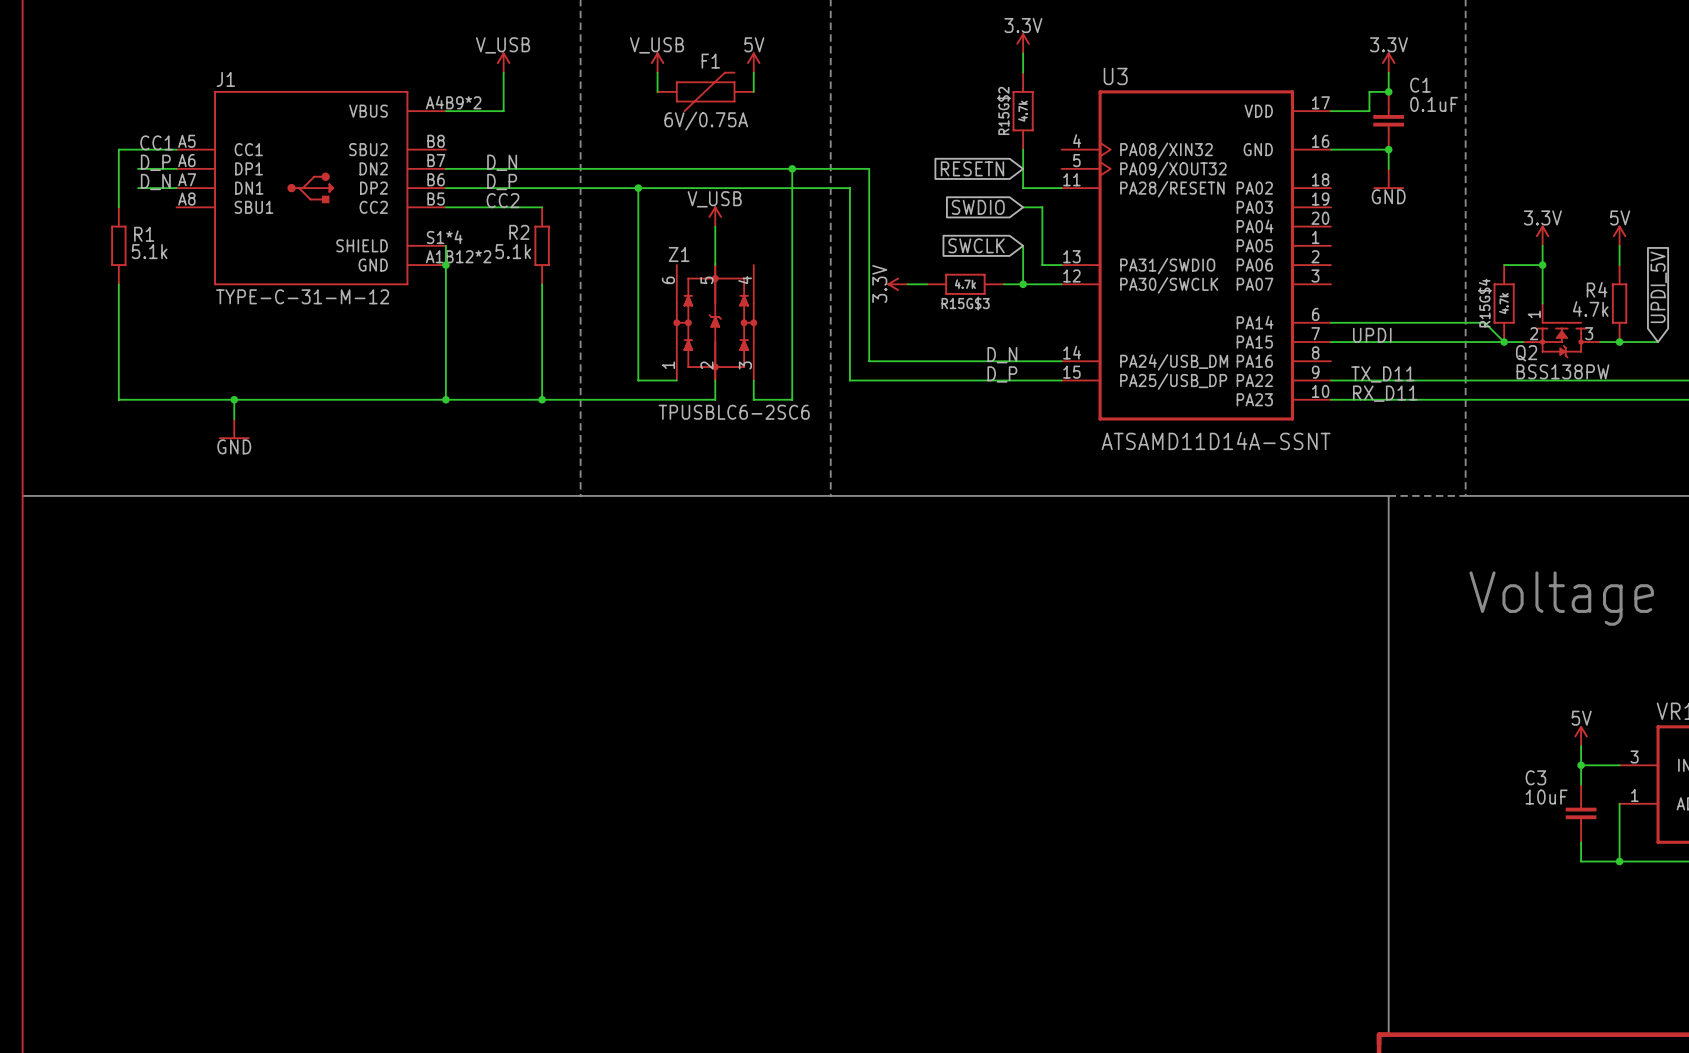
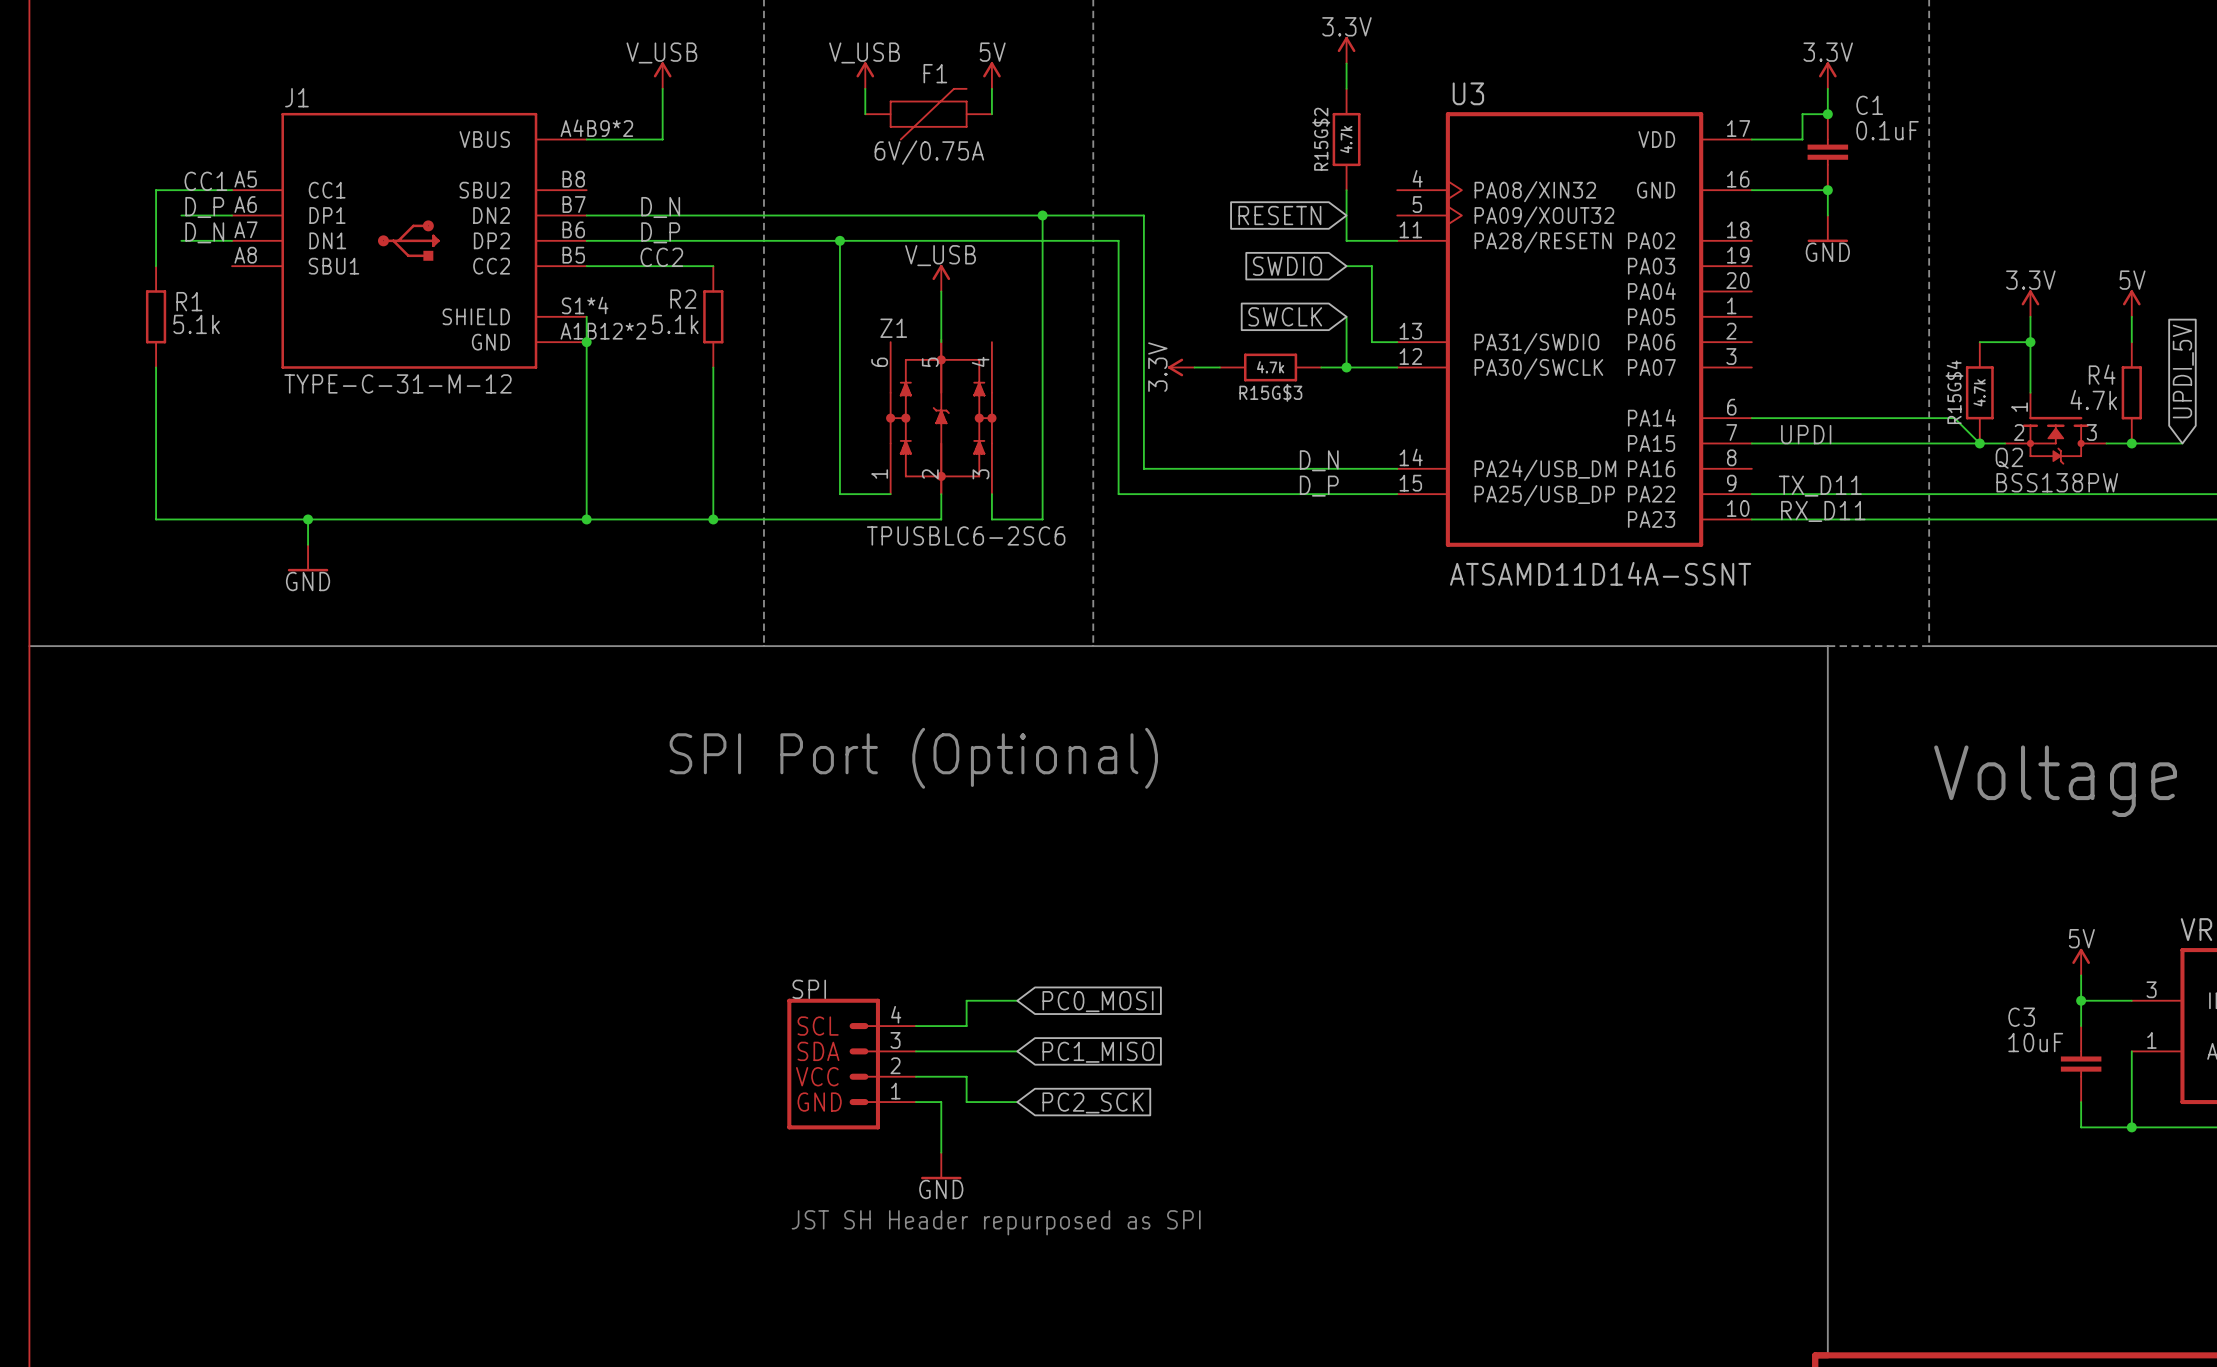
text: none -> SPI Port (Optional) (913, 758)
wire: none -> (1017, 1000) (966, 1000) (966, 1026) (915, 1026)
global label: none -> PC0_MOSI (1098, 1001)
wire: none -> (915, 1051) (1017, 1051)
global label: none -> PC1_MISO (1098, 1052)
SPI: none -> (851, 1064)
wire: none -> (915, 1076) (966, 1076) (966, 1102) (1017, 1102)
wire: none -> (915, 1102) (941, 1102) (941, 1152)
global label: none -> PC2_SCK (1093, 1102)
power symbol: none -> GND (941, 1166)
text: none -> JST SH Header repurposed as SPI (996, 1222)

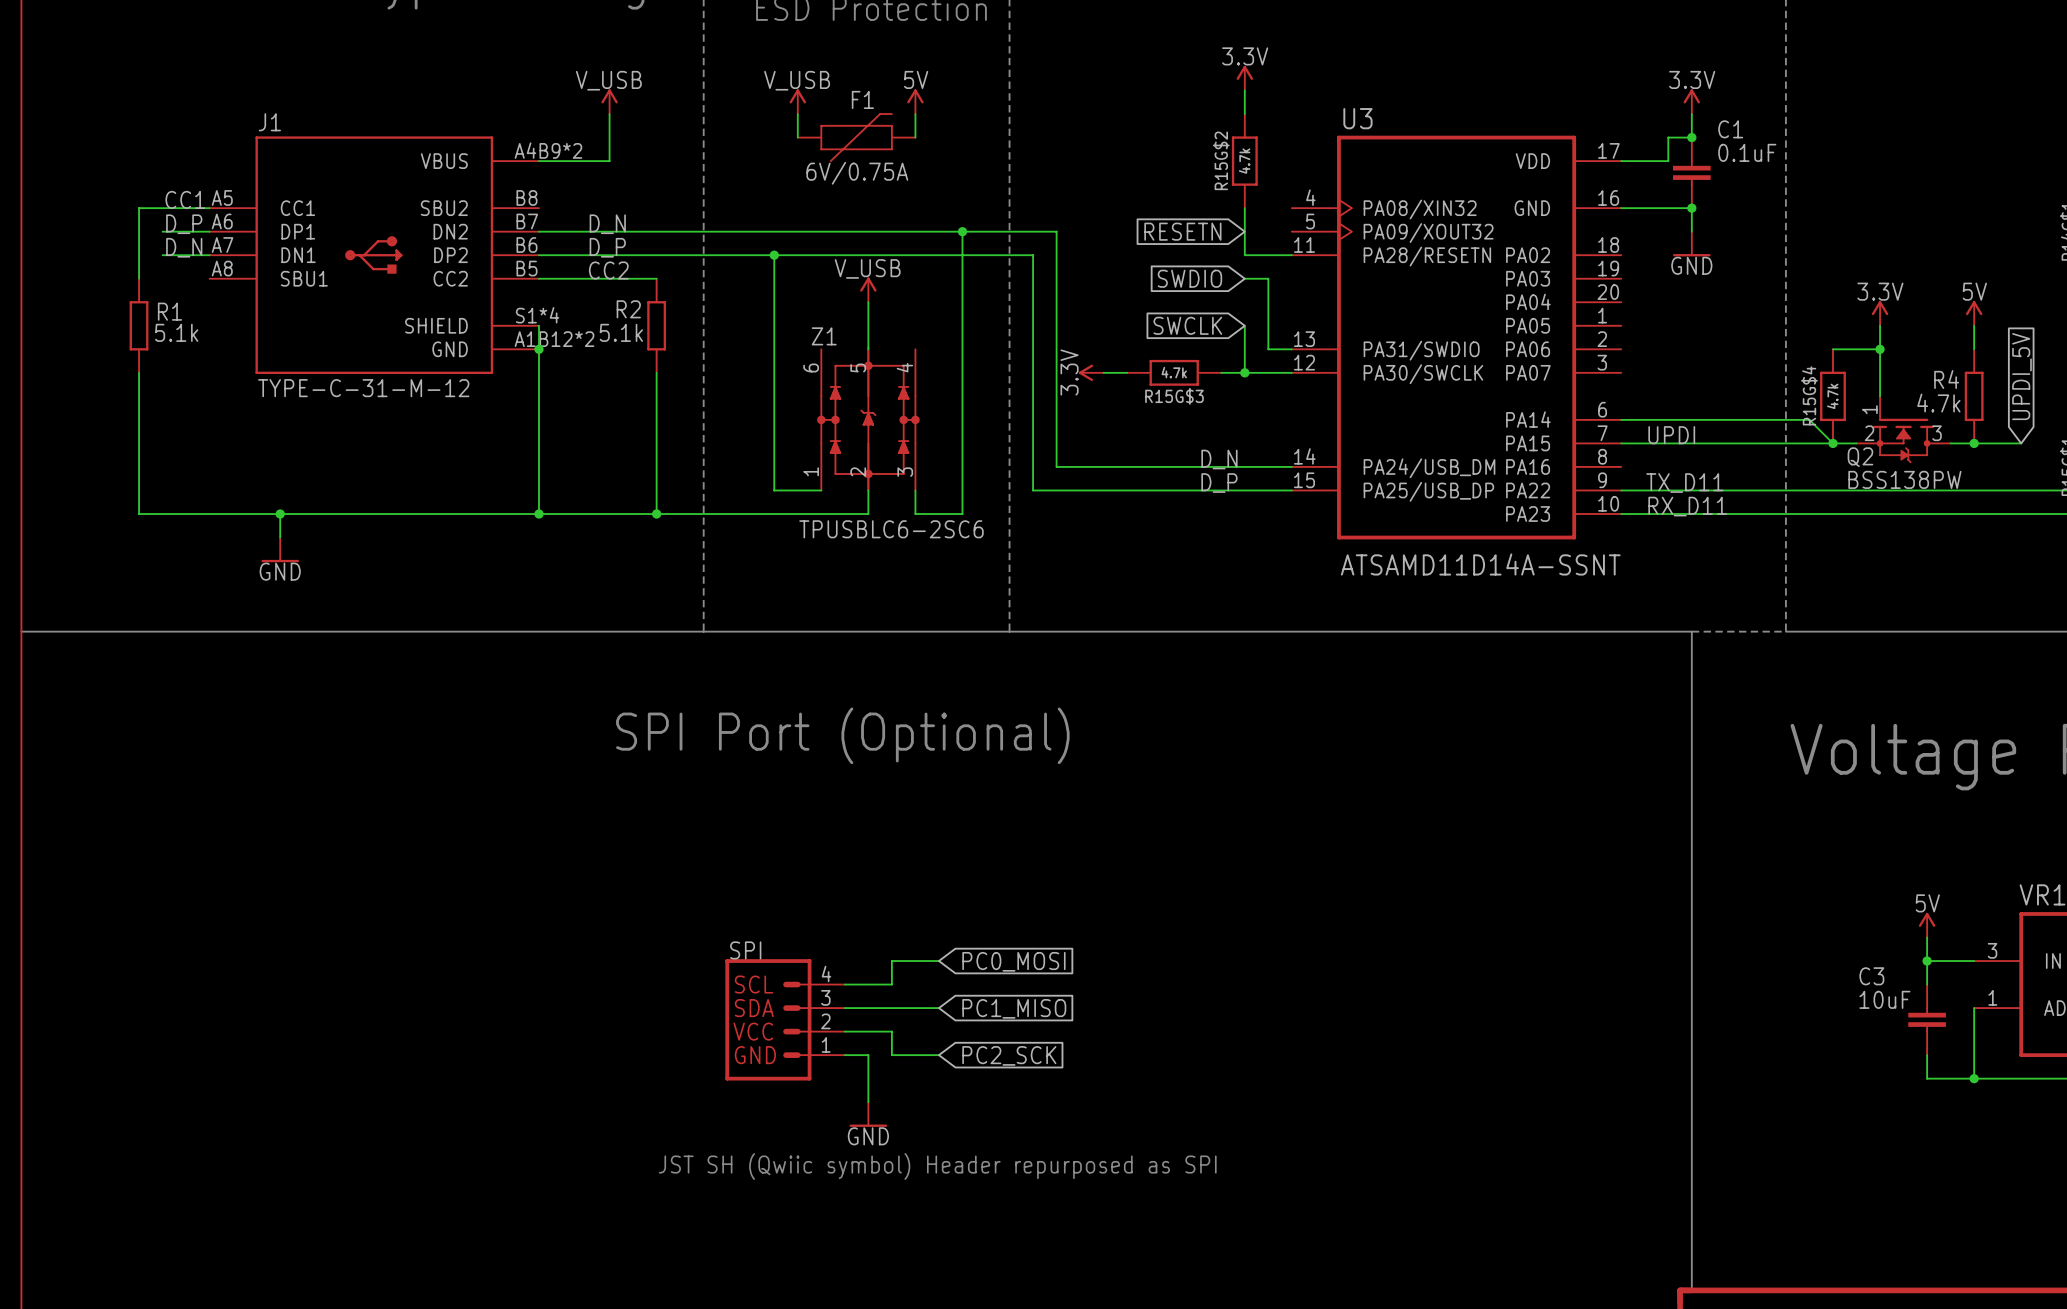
text: JST SH Header repurposed as SPI (996, 1222) -> JST SH (Qwiic symbol) Header repurposed as SPI (937, 1166)

